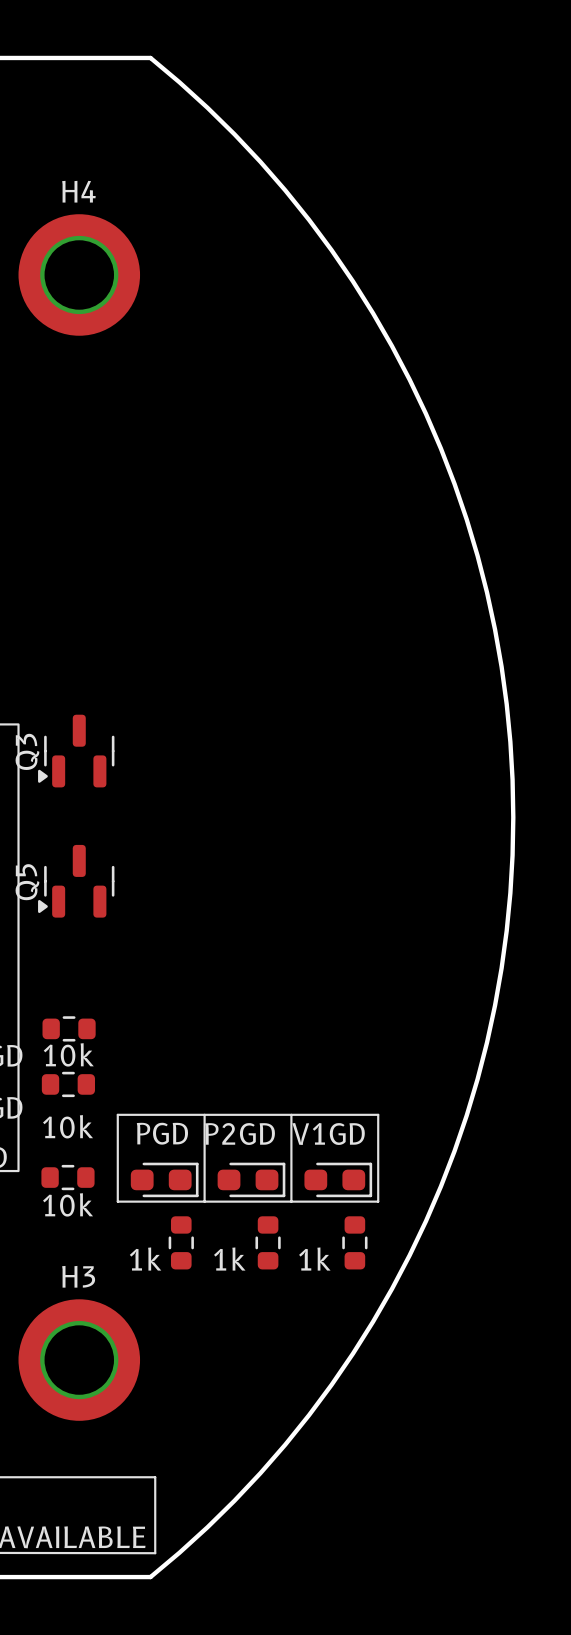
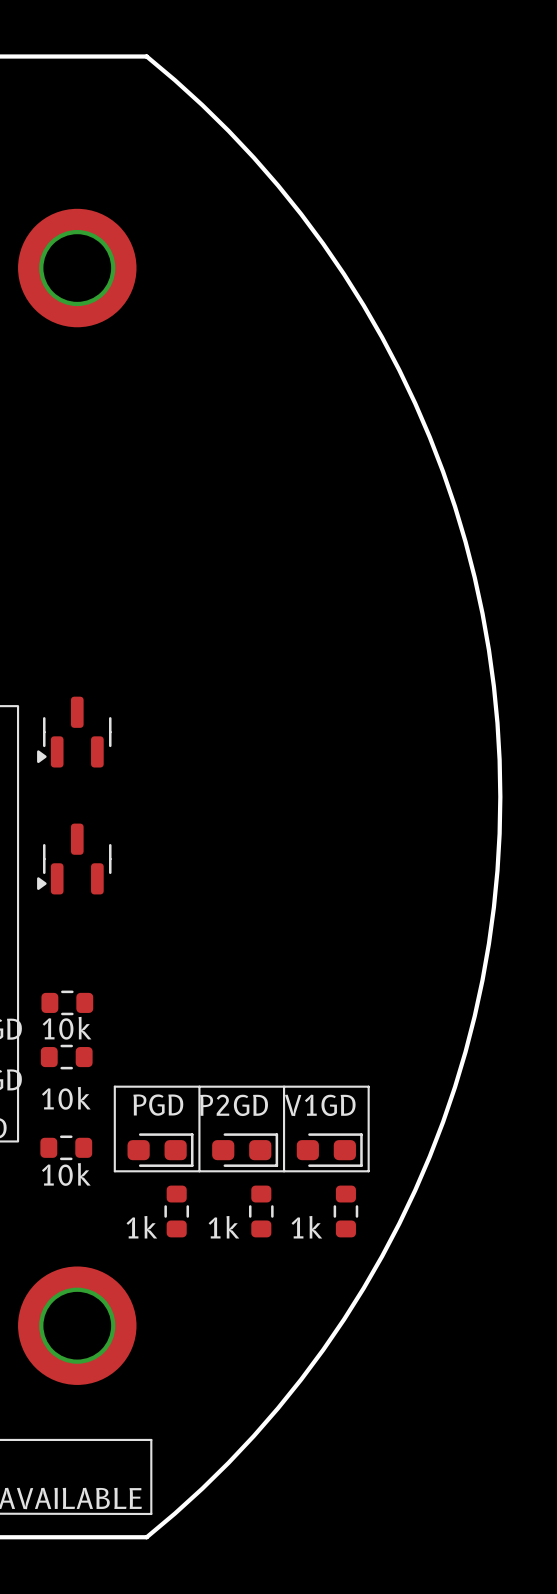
H4 name: H4 (78, 191) -> none
Q3 name: Q3 (27, 751) -> none
Q5 name: Q5 (27, 882) -> none
H3 name: H3 (78, 1276) -> none

